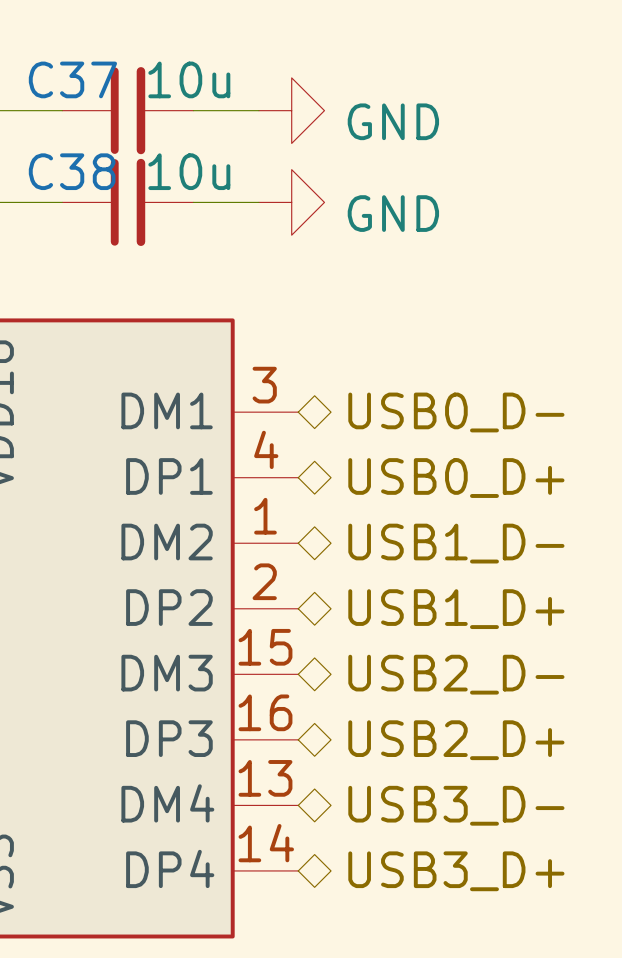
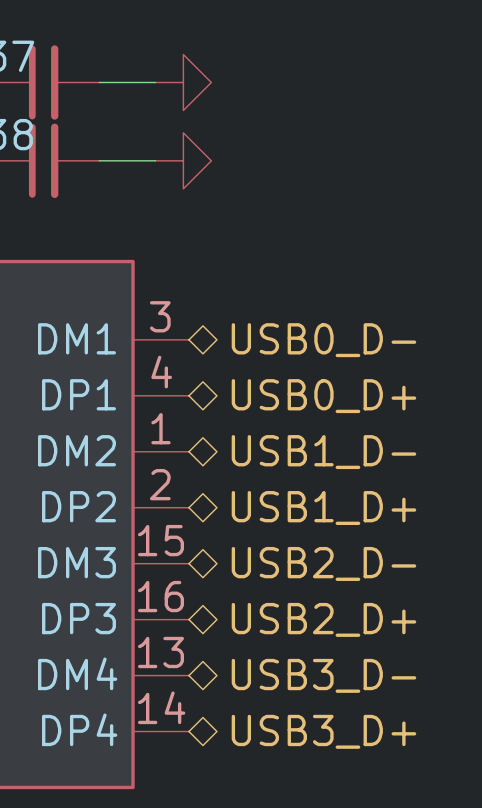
C37 value: 10u (189, 79) -> none
power symbol text: GND (393, 121) -> none
C38 value: 10u (189, 171) -> none
power symbol text: GND (393, 213) -> none

